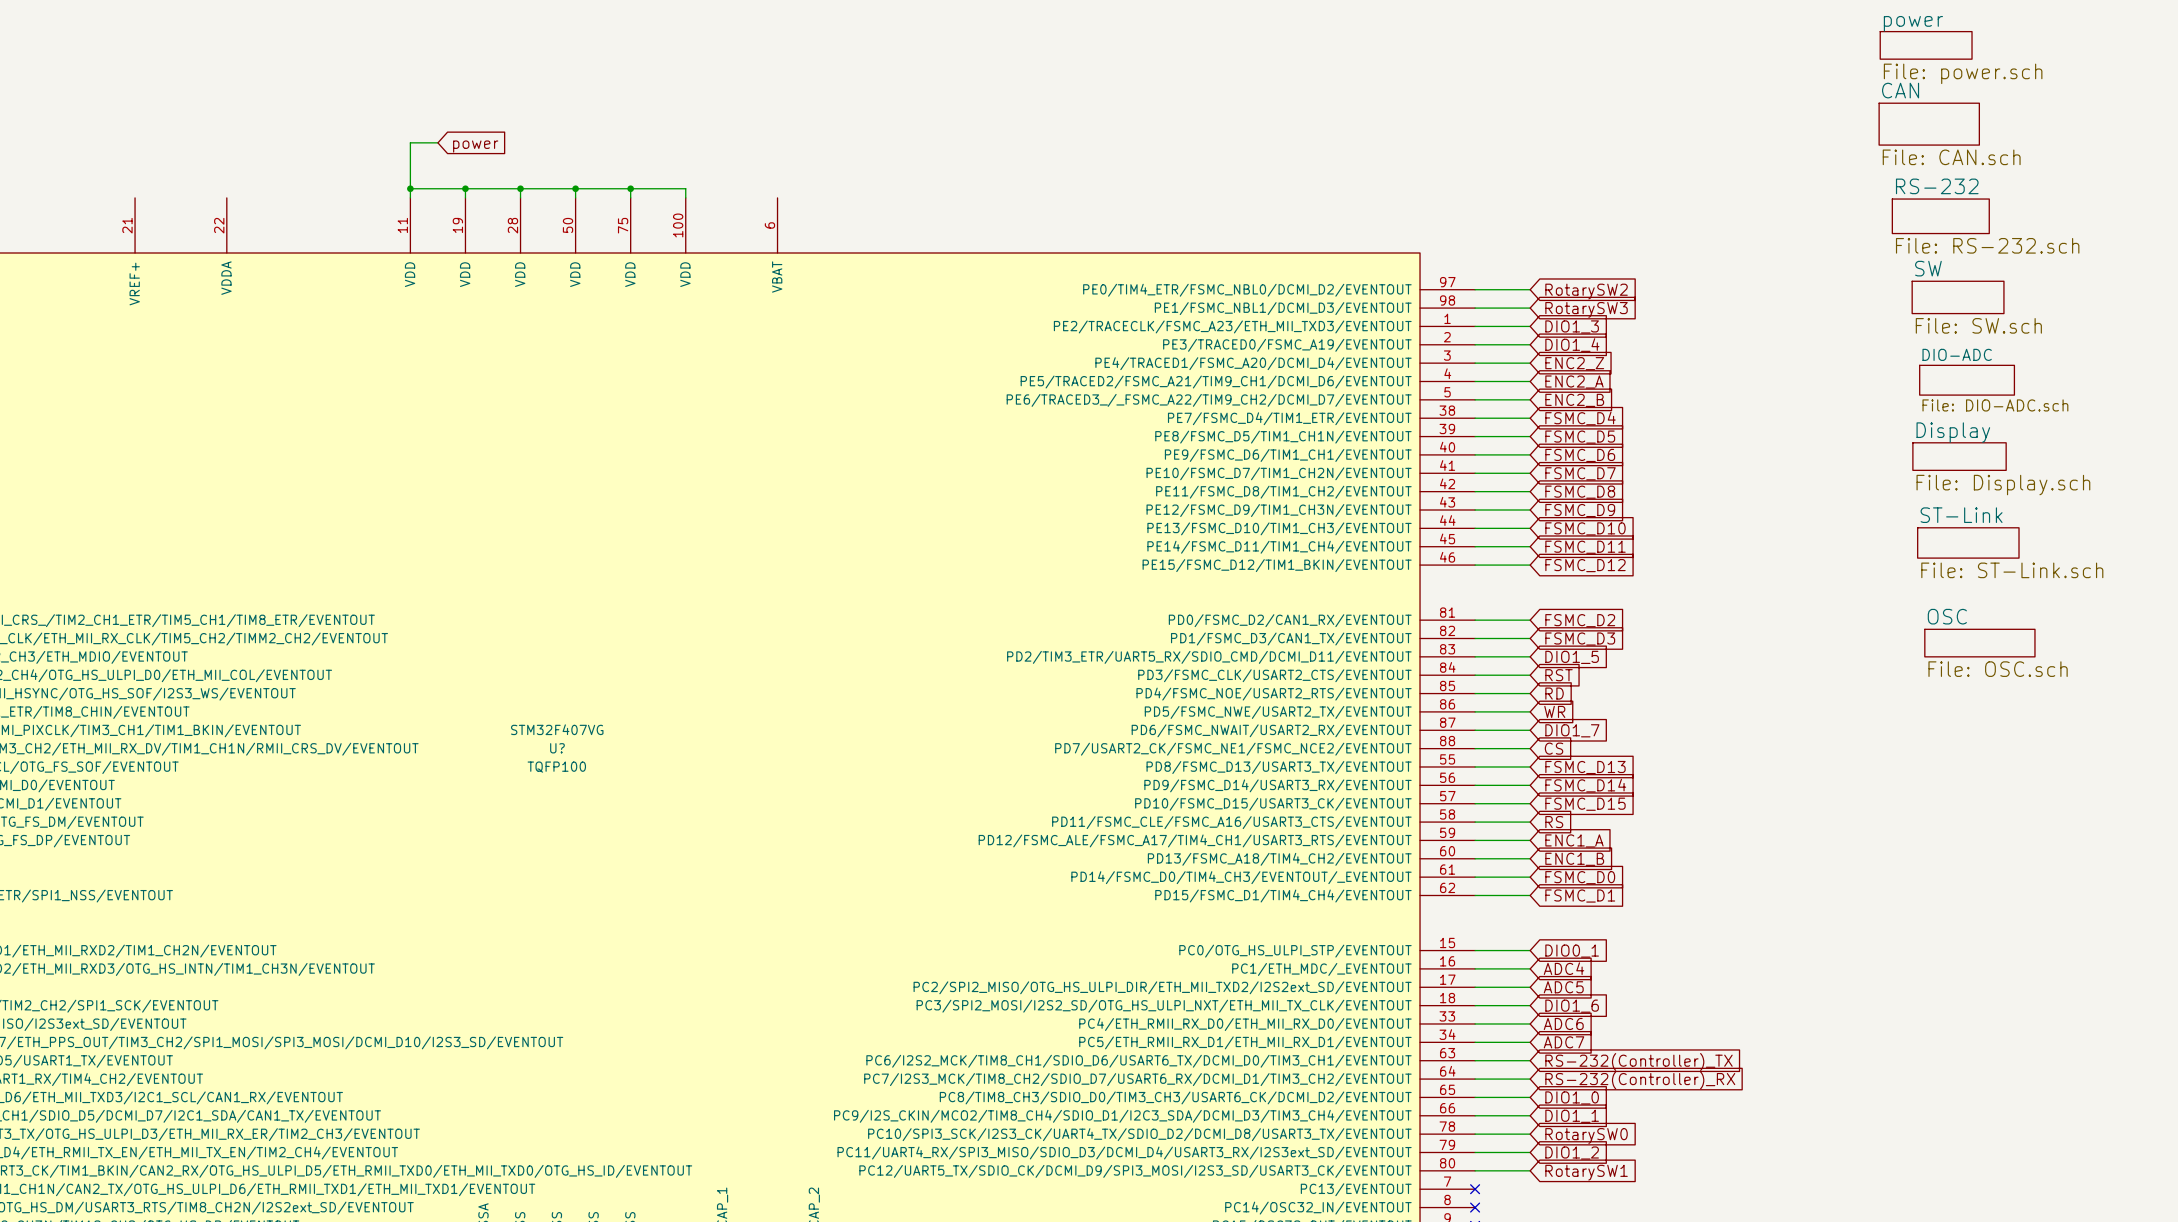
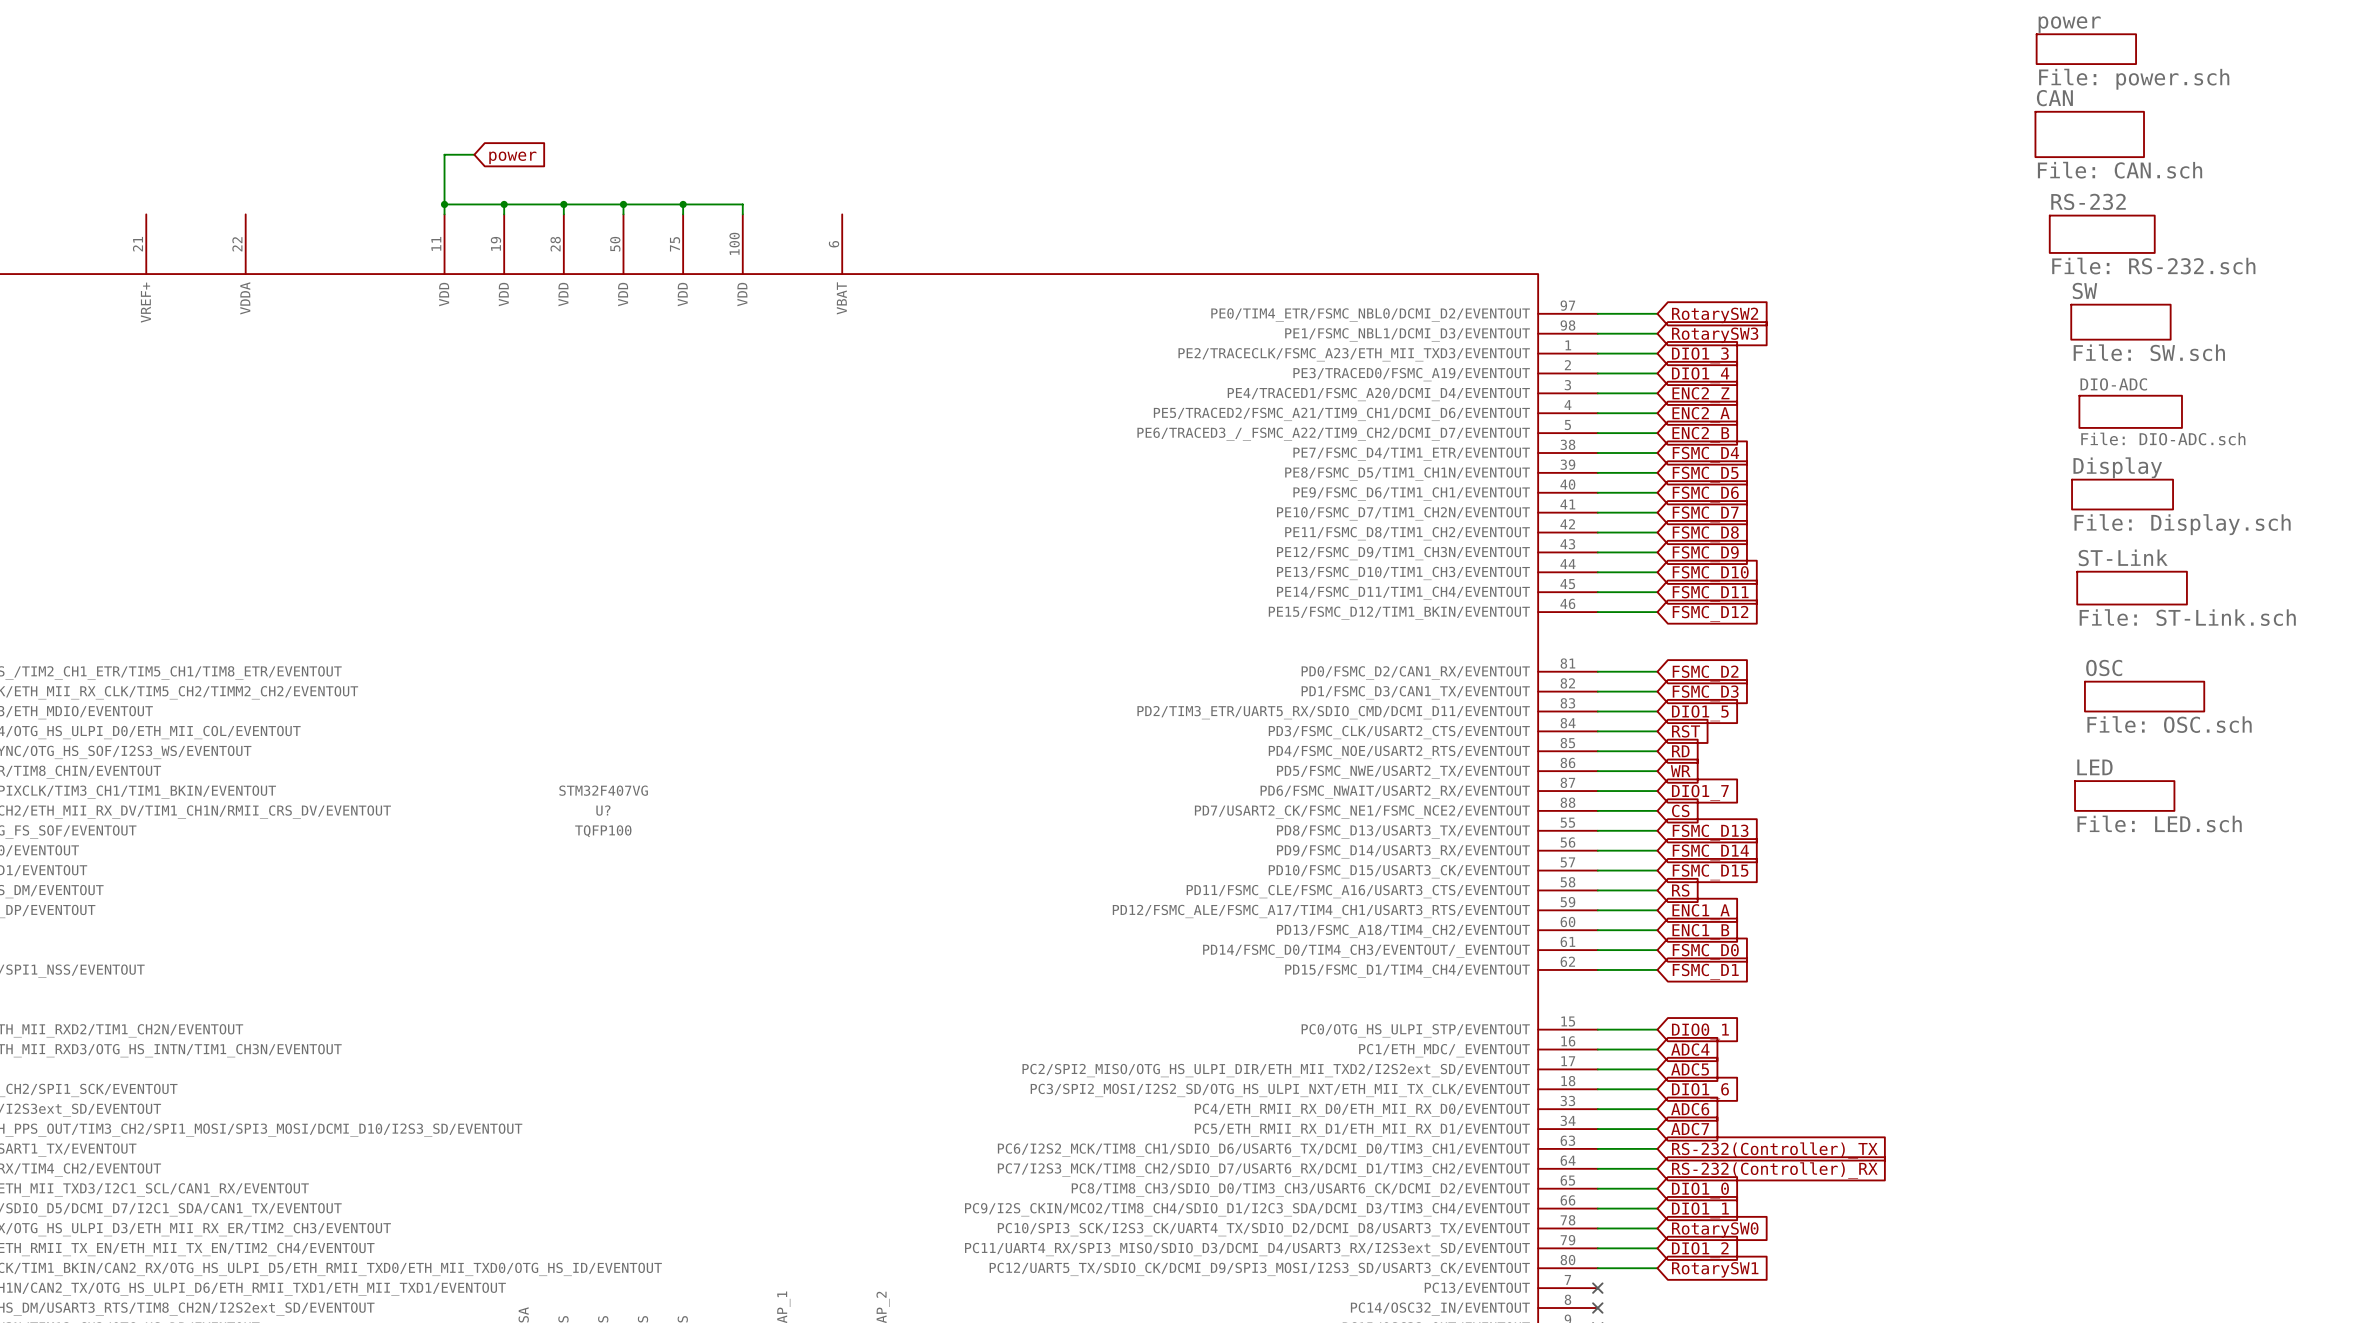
sheet LED: none -> File: LED.sch (2124, 796)

